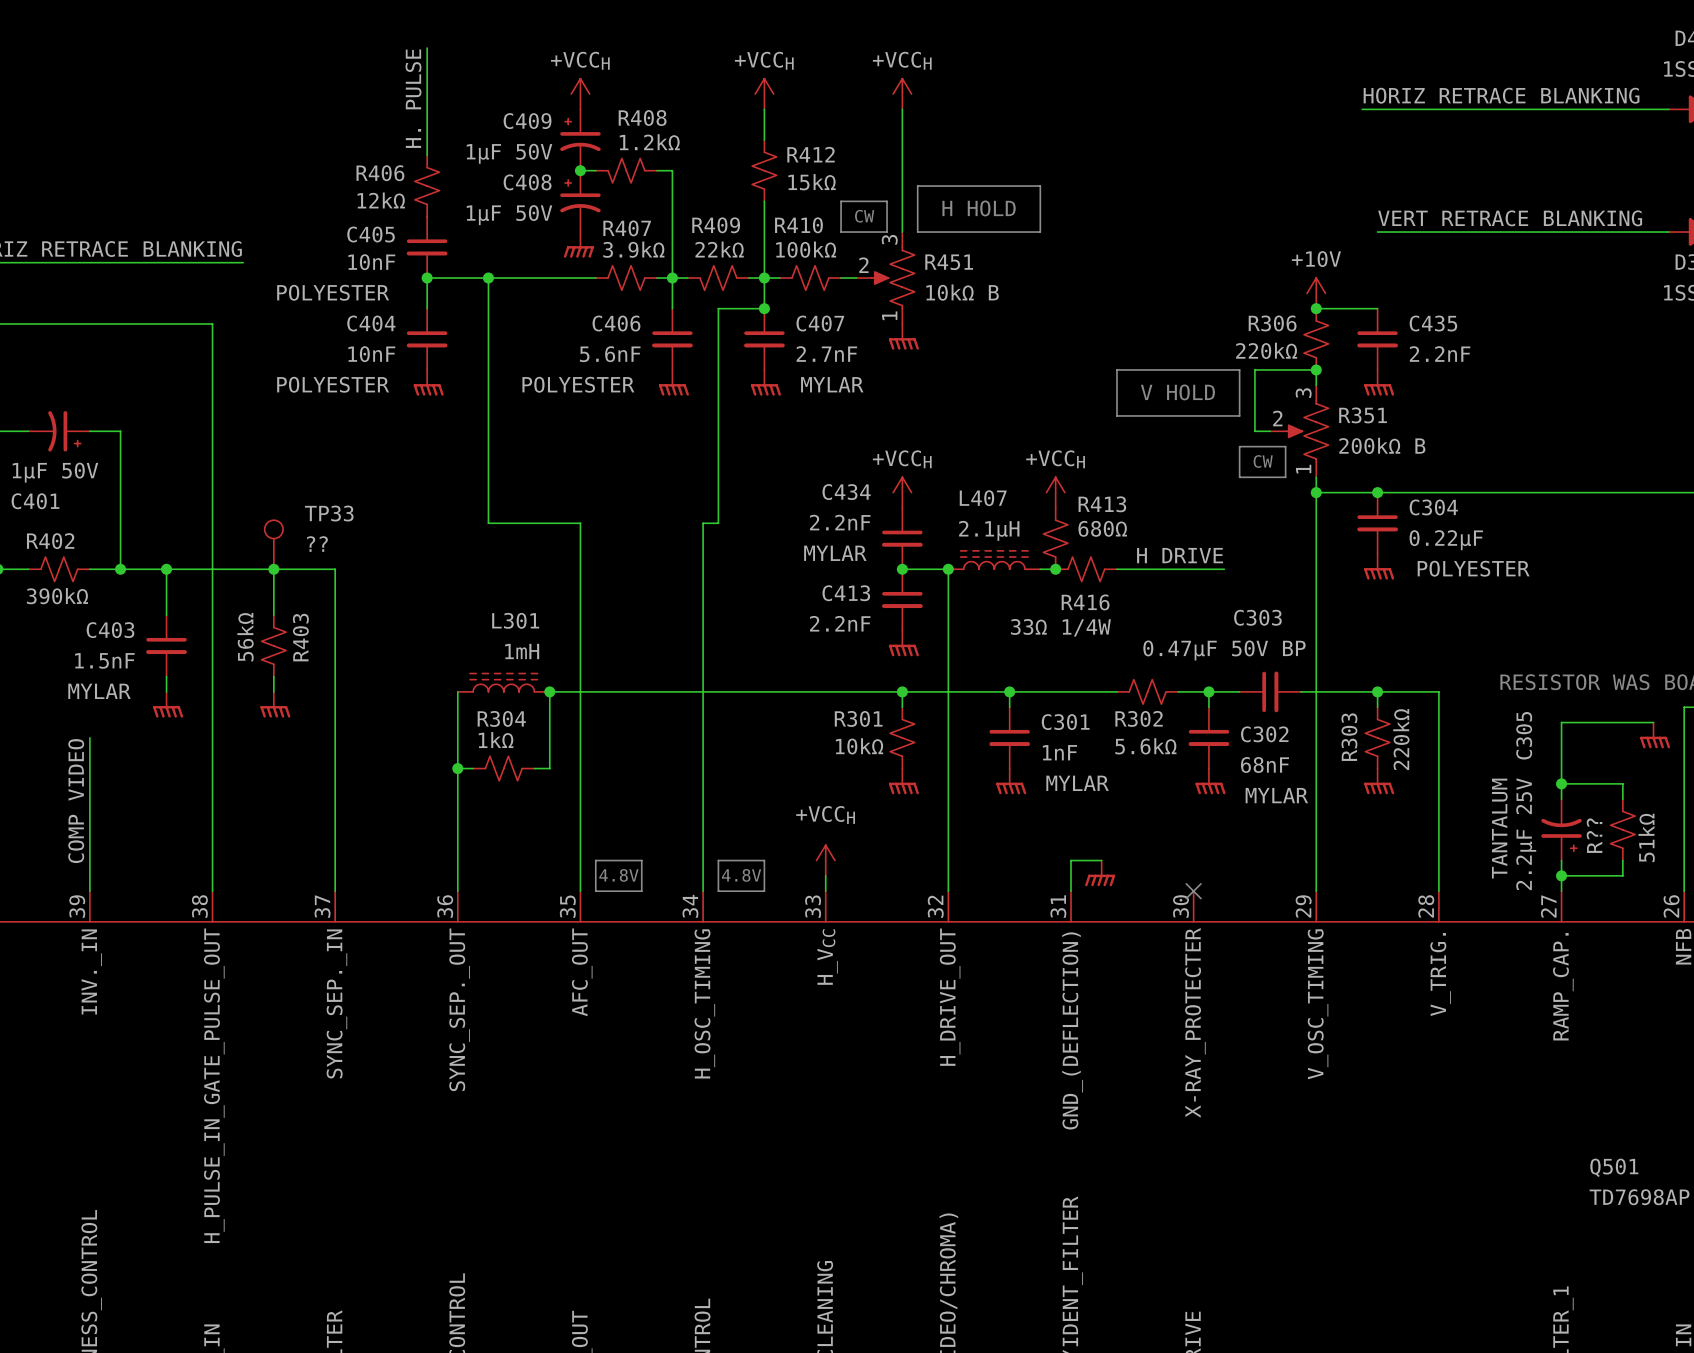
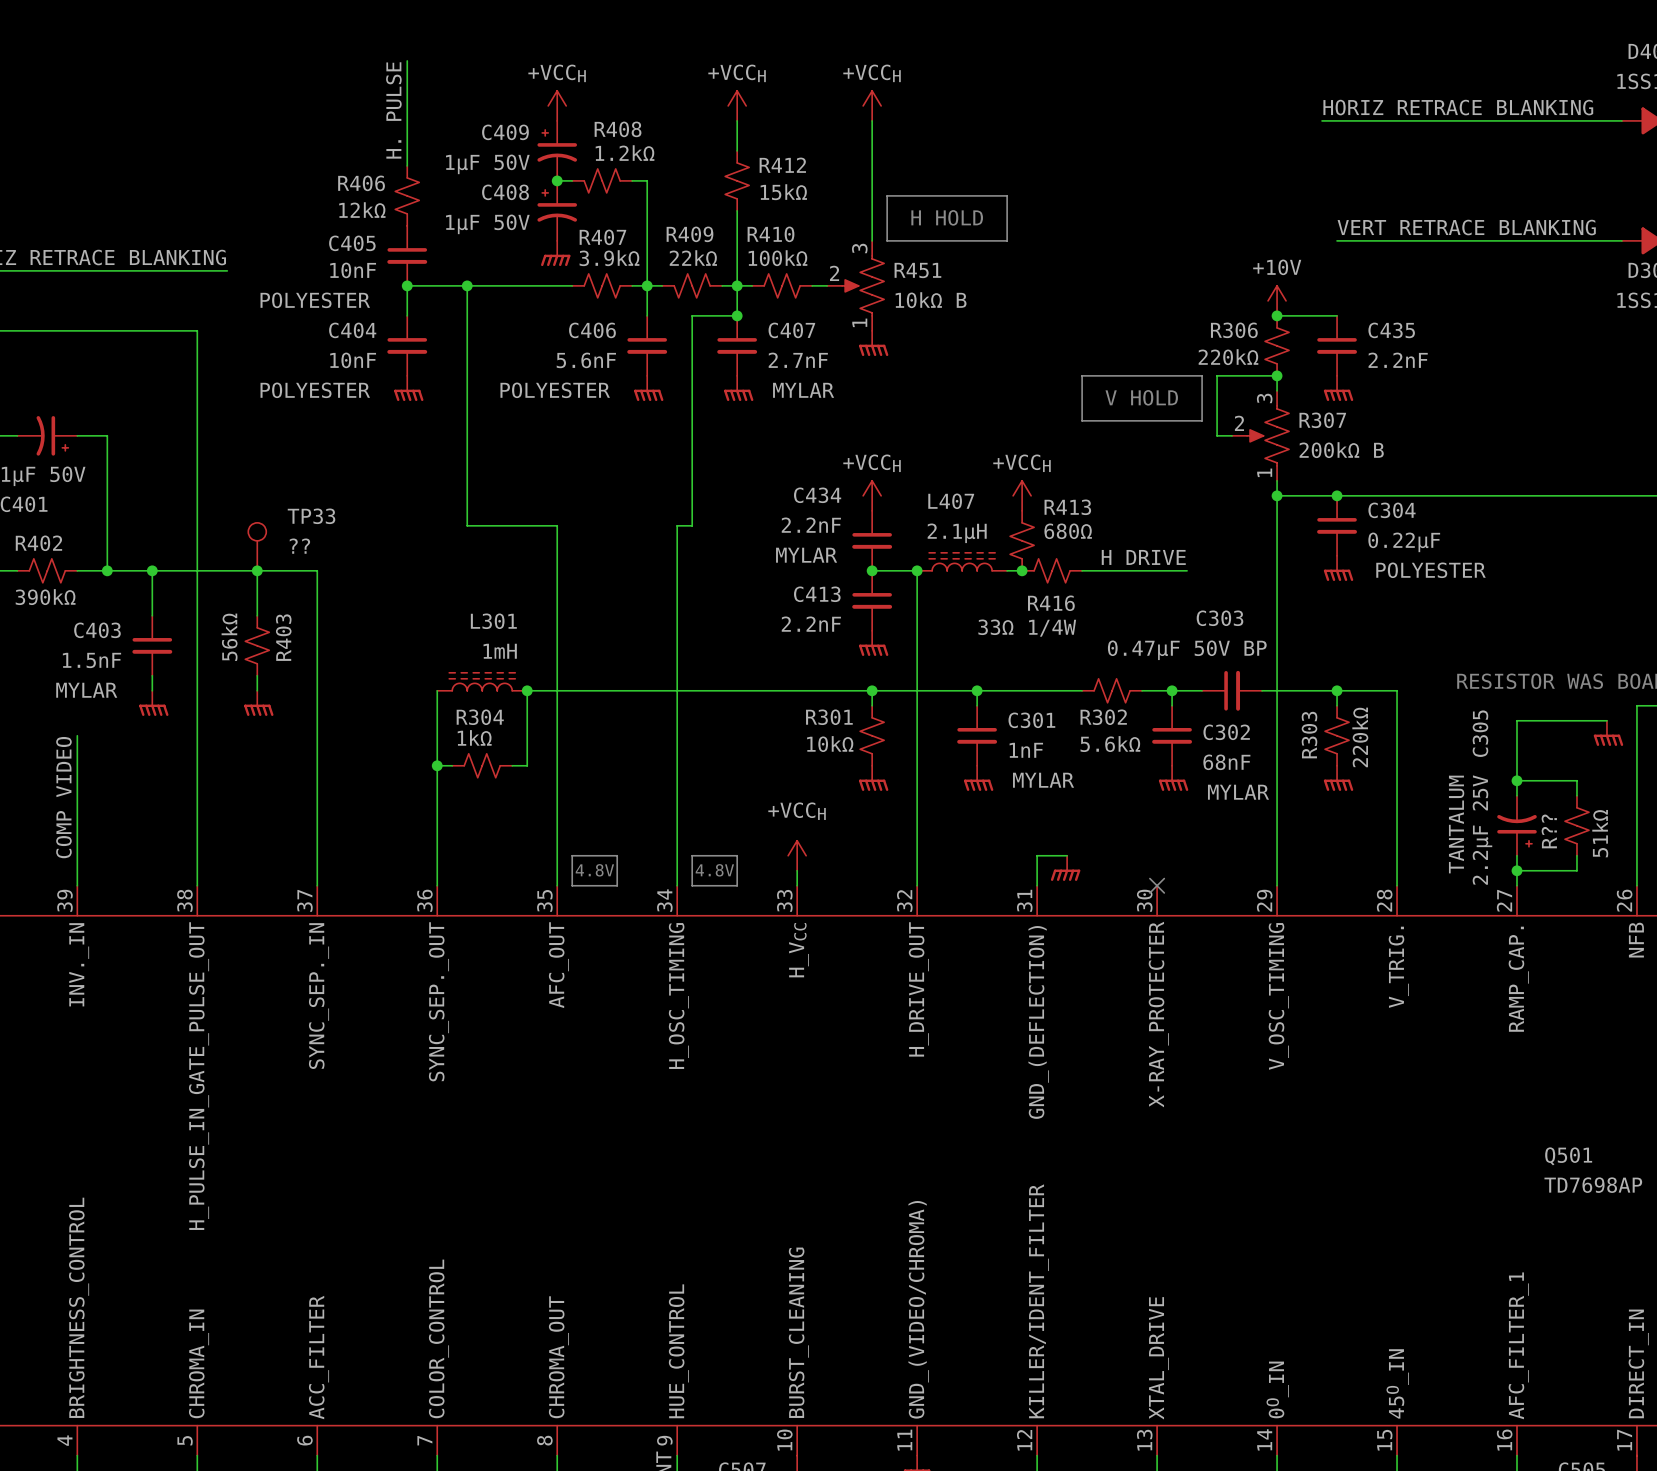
line: (841, 201) (887, 201) (887, 232) (841, 232) (841, 201) -> none
text: CW (864, 216) -> none
R351 name: R351 (1363, 415) -> R307 (1322, 420)
line: (1239, 446) (1239, 477) (1285, 477) (1285, 446) (1239, 446) -> none
text: CW (1263, 461) -> none

